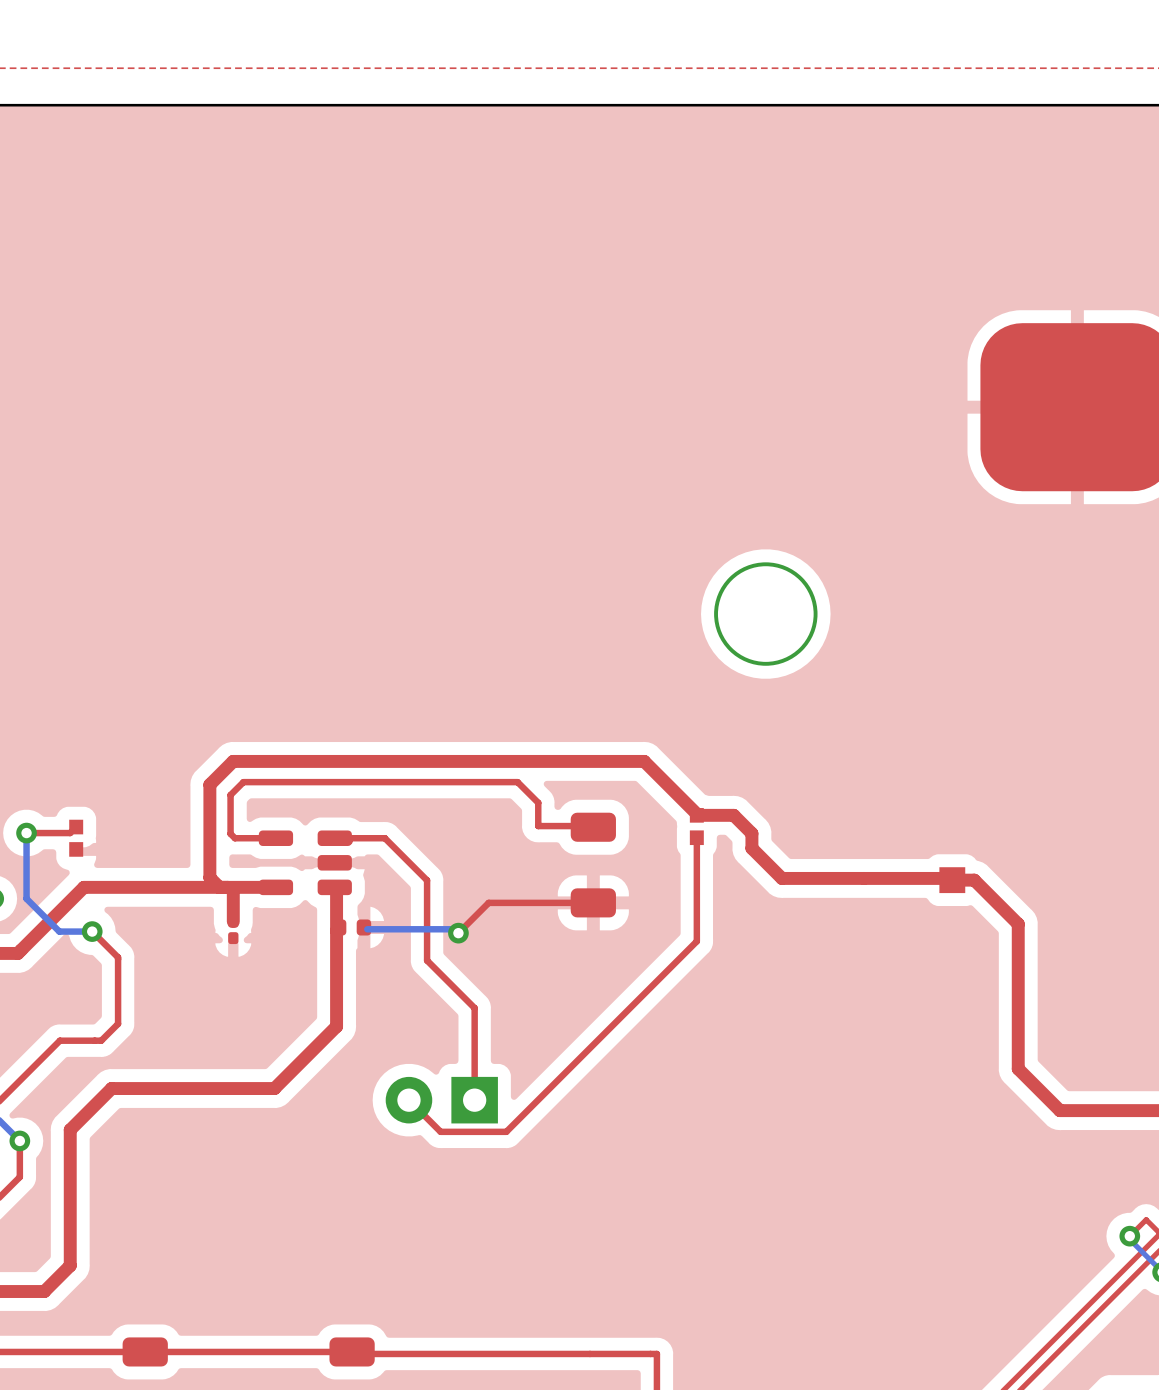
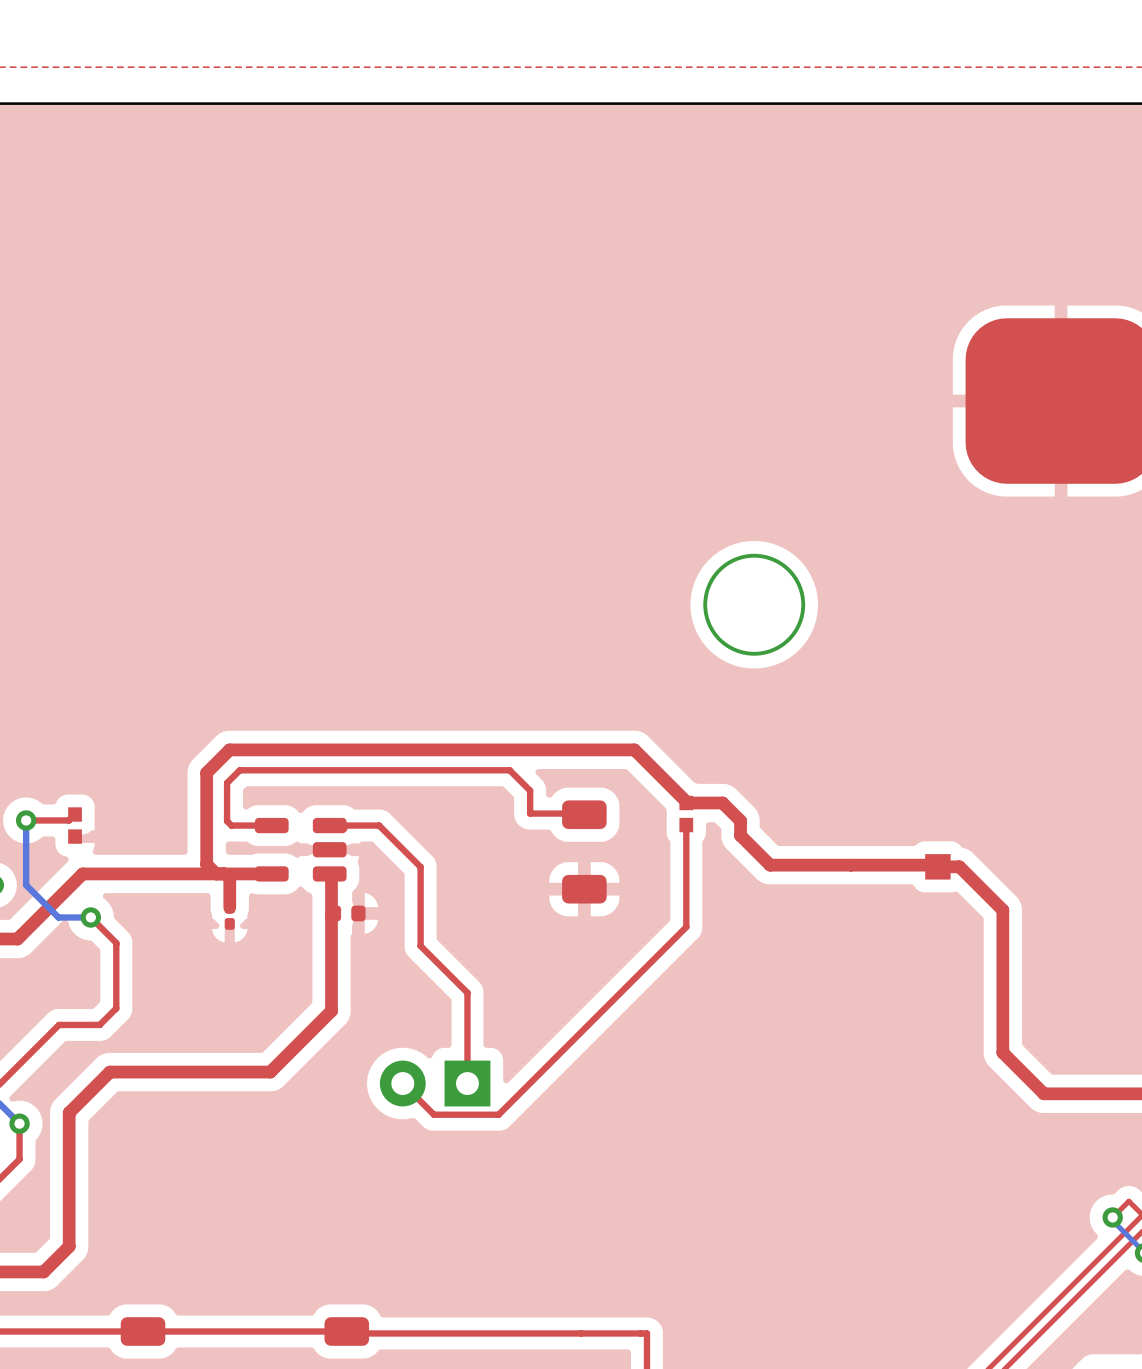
top track: (593, 902) (488, 902) (458, 933) -> none
bottom track: (456, 929) (367, 929) -> none
via: (458, 933) -> none

